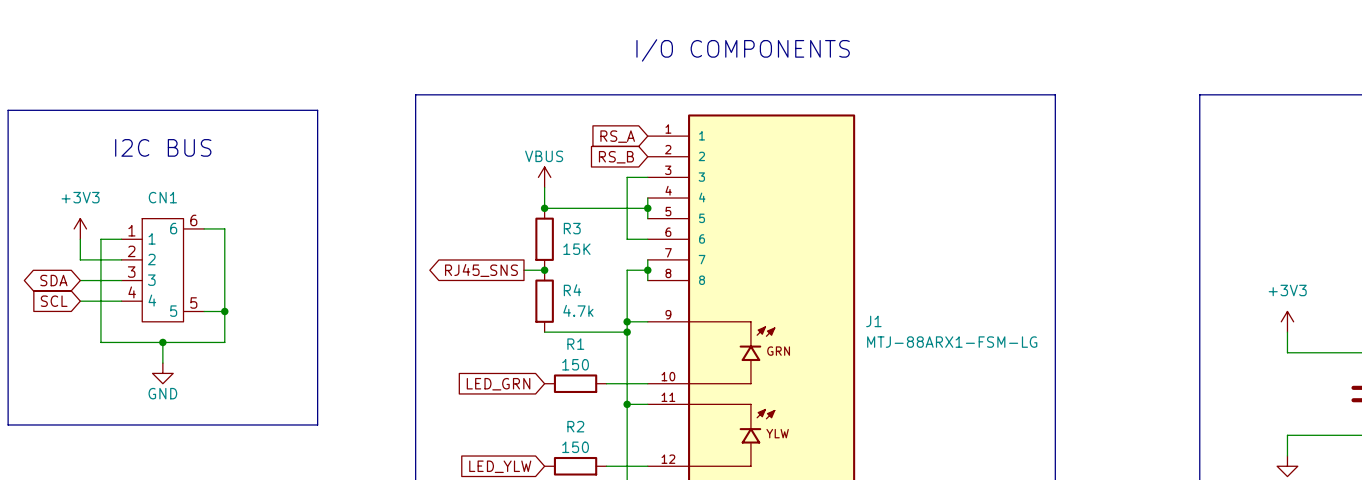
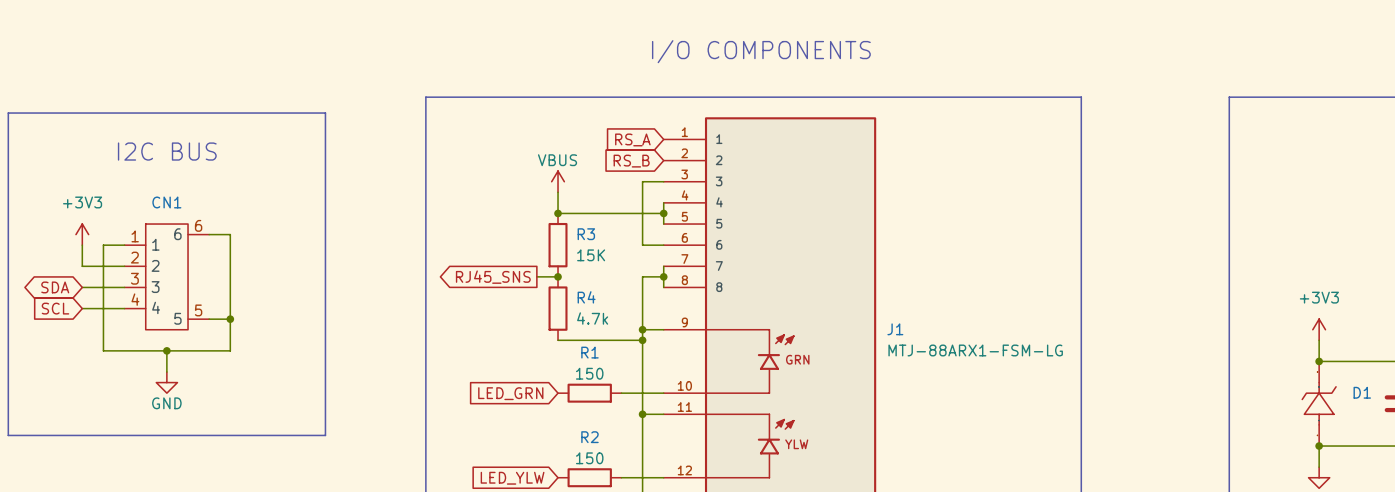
junction: none -> (1319, 361)
D1: none -> (1319, 403)
junction: none -> (1319, 446)

